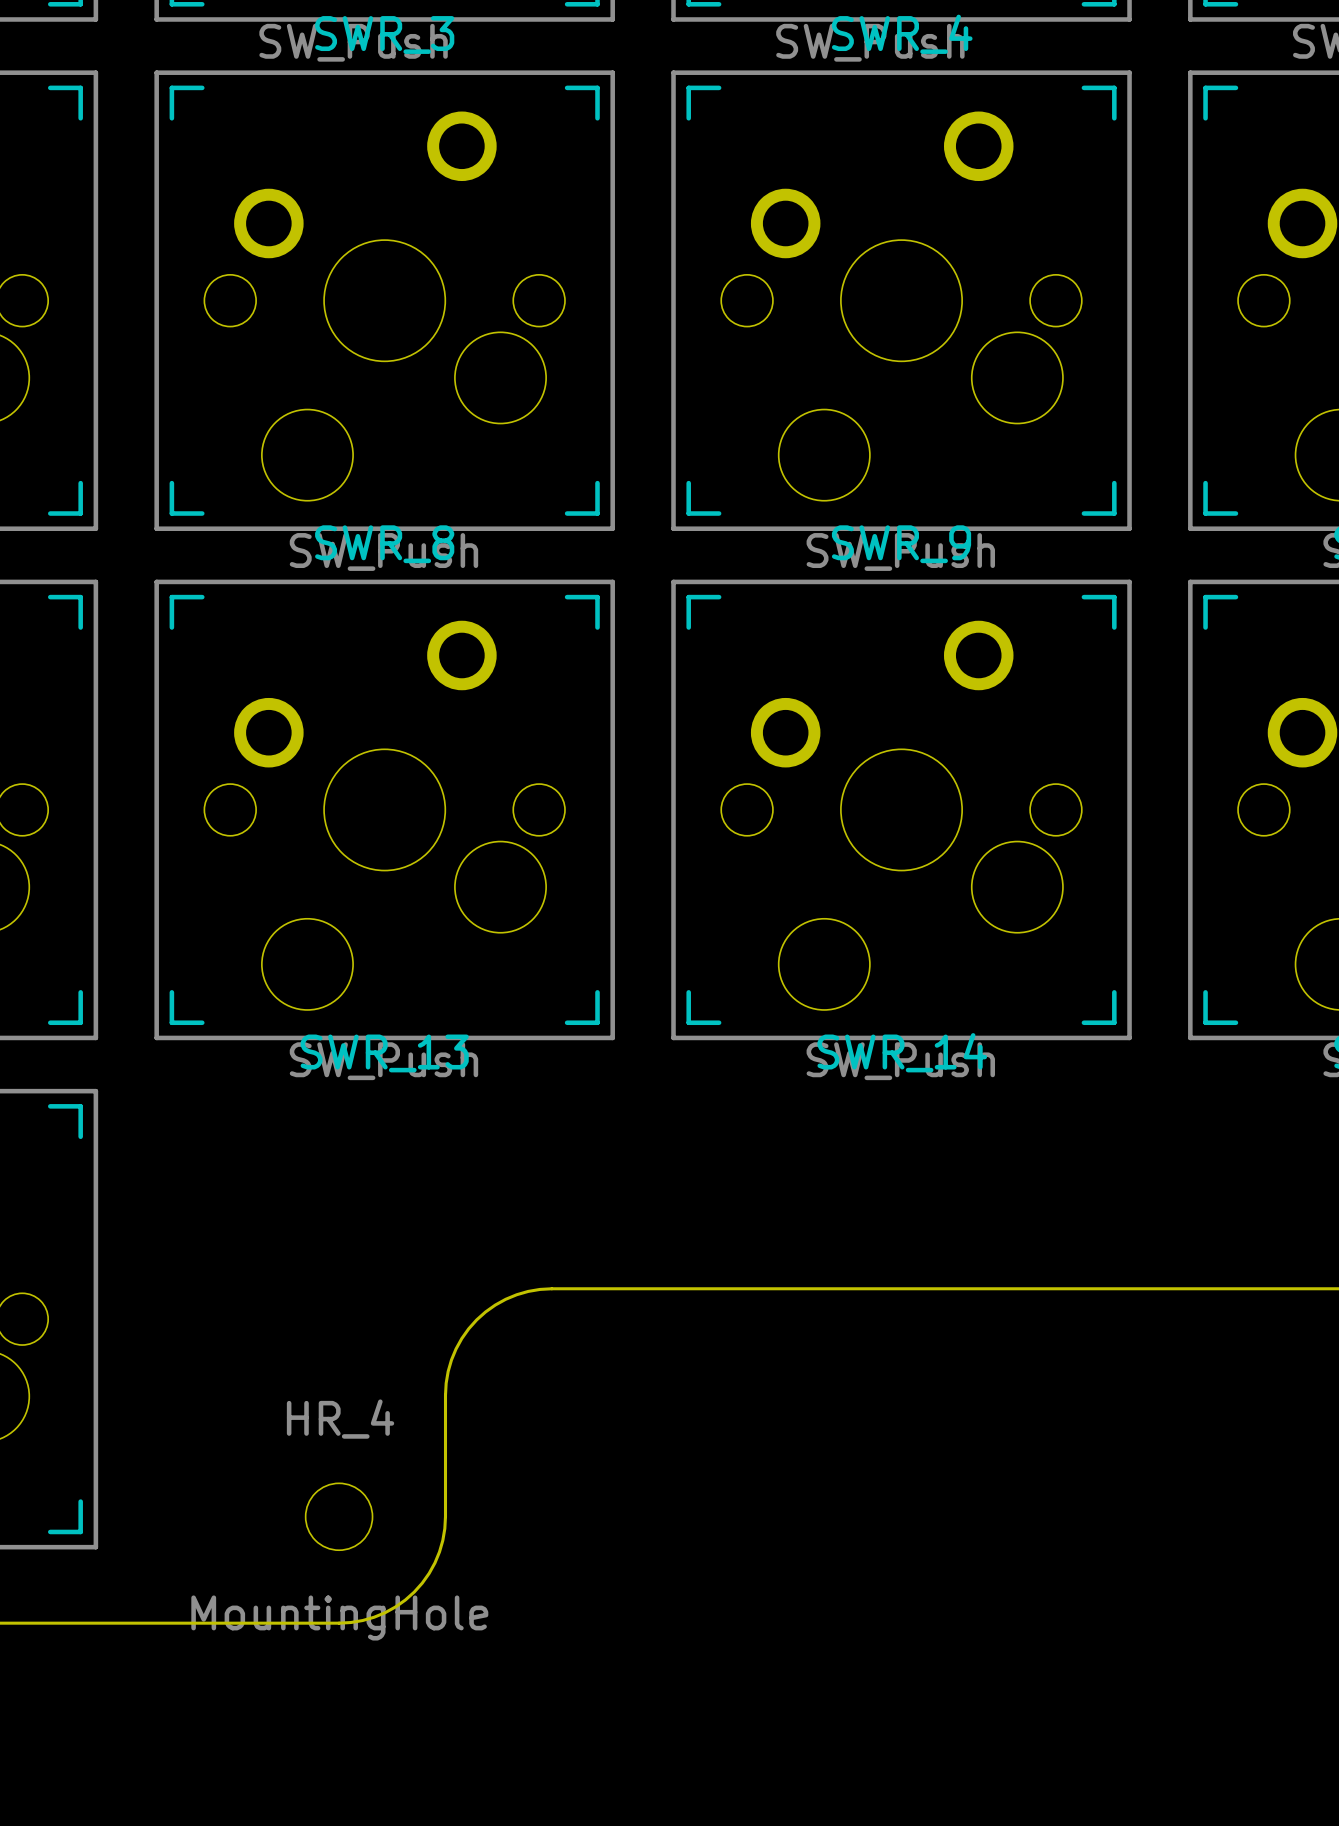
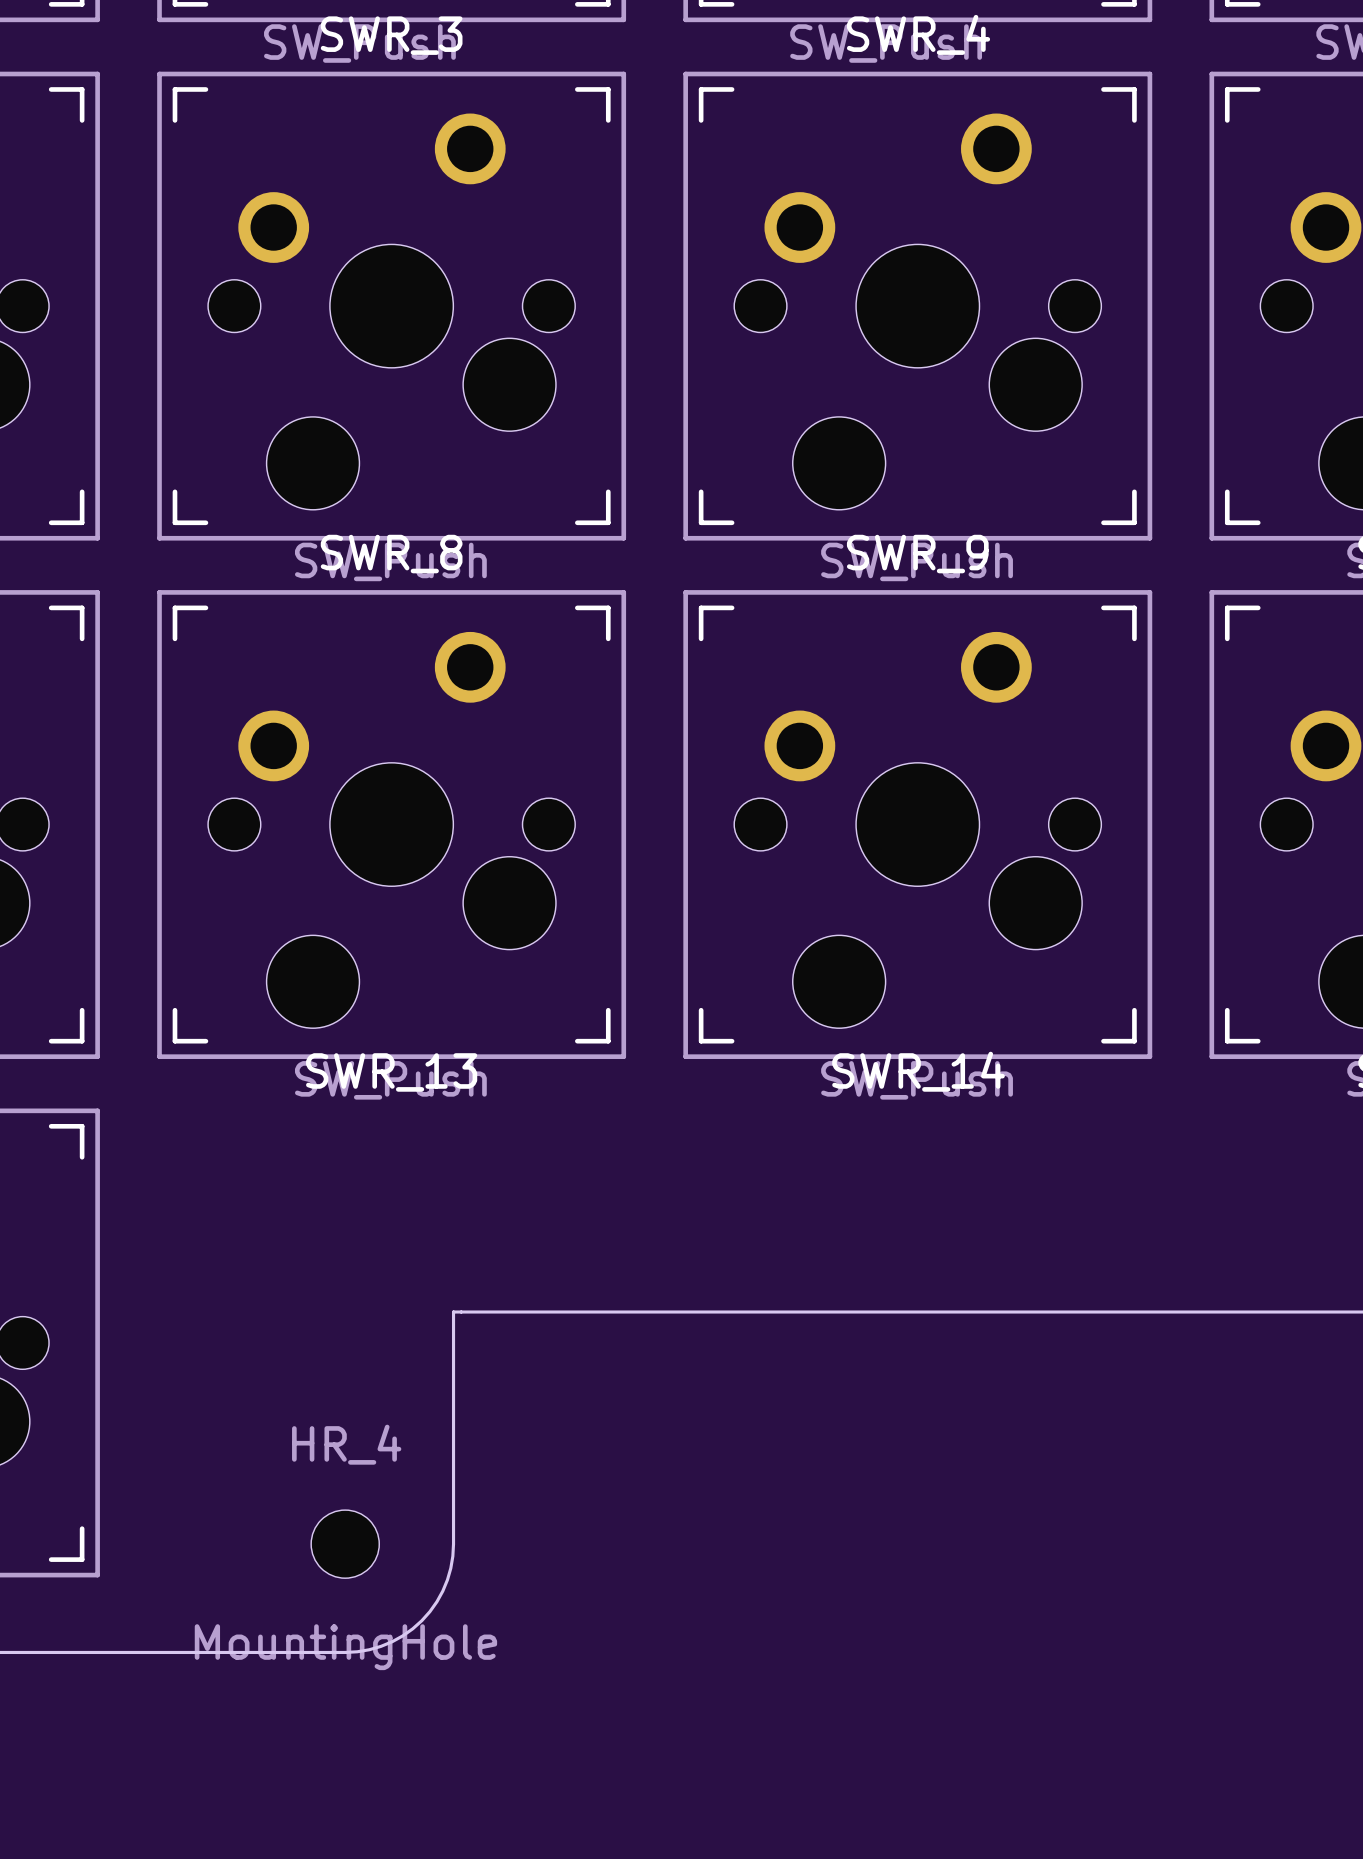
board edge: (551, 1288) (528, 1291) (505, 1299) (476, 1319) (456, 1348) (448, 1371) (445, 1395) -> (561, 1312) (453, 1312) (453, 1420)

